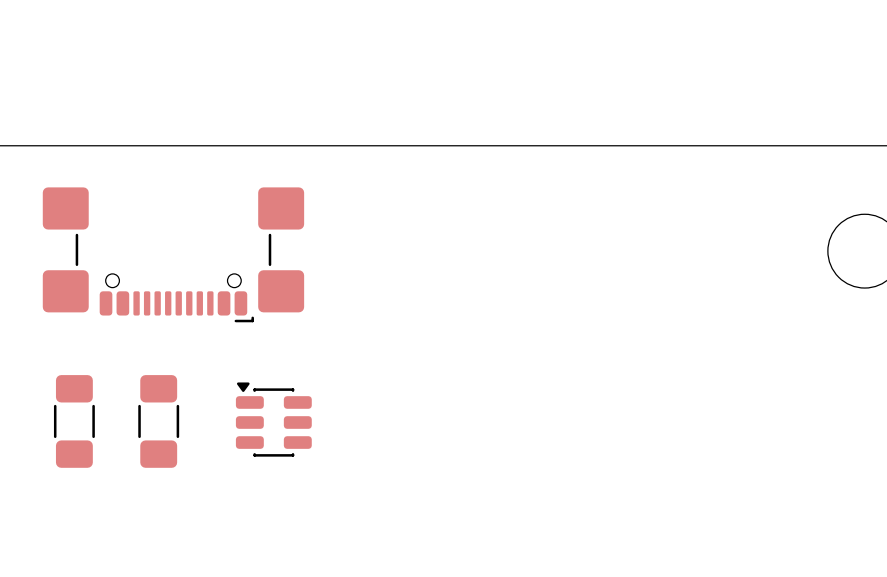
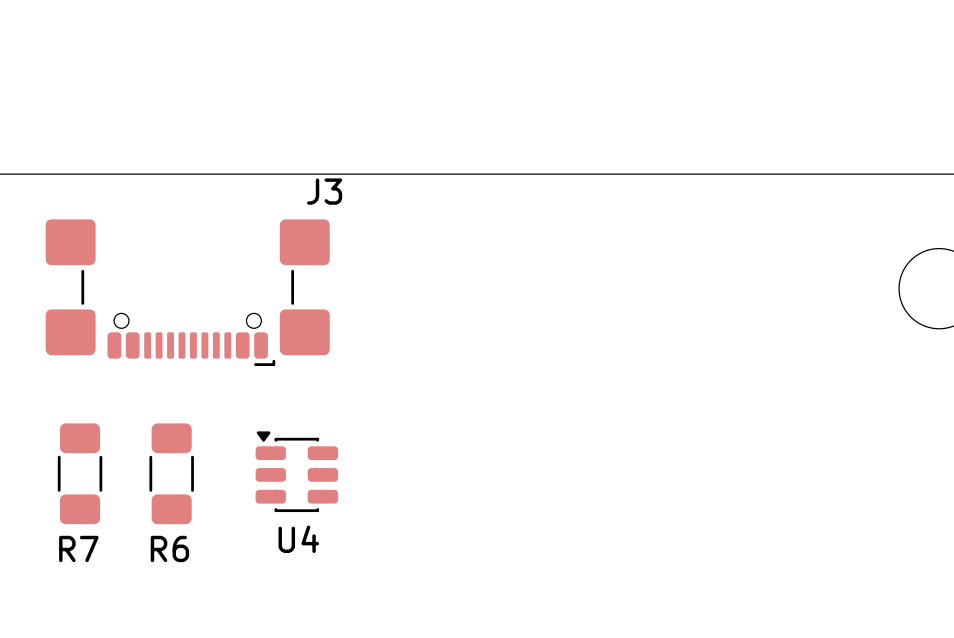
J3 name: none -> J3 (324, 191)
U4 name: none -> U4 (298, 539)
R7 name: none -> R7 (78, 548)
R6 name: none -> R6 (169, 548)

